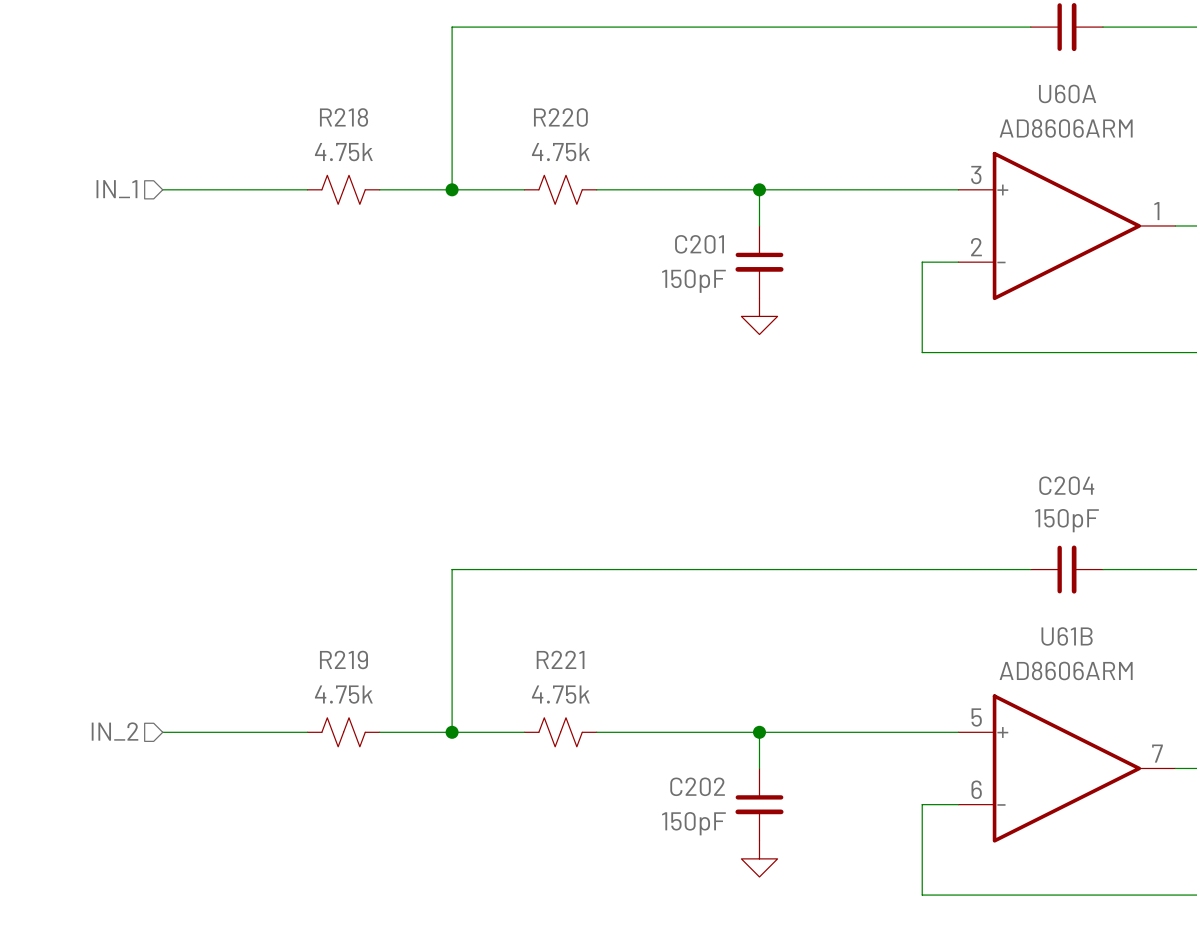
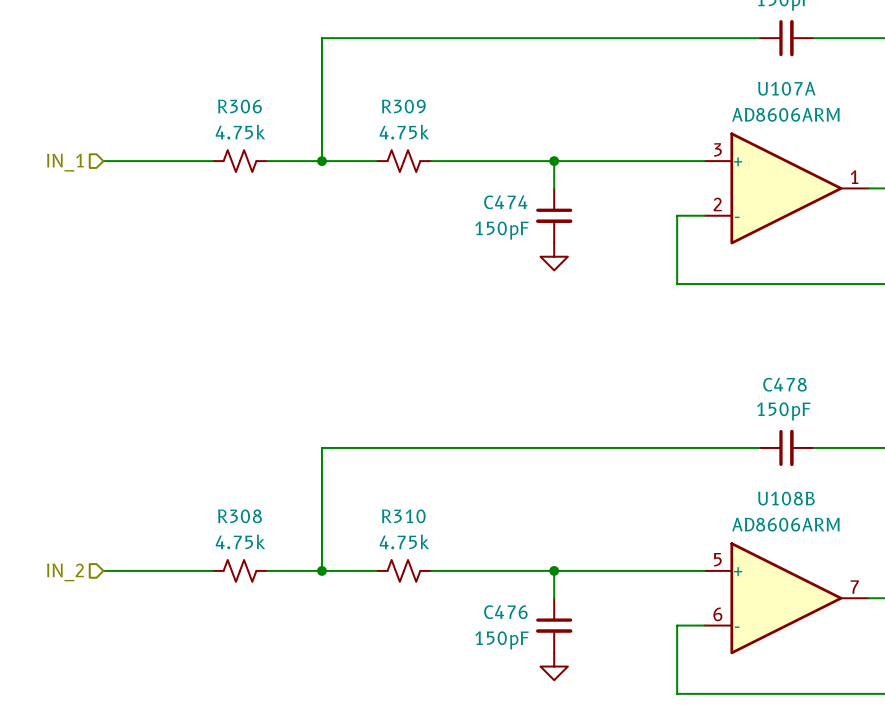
U60A name: U60A (1067, 93) -> U107A (786, 88)
R218 name: R218 (344, 117) -> R306 (239, 106)
R220 name: R220 (560, 117) -> R309 (403, 106)
C201 name: C201 (699, 244) -> C474 (505, 202)
C204 name: C204 (1066, 485) -> C478 (785, 384)
U61B name: U61B (1067, 636) -> U108B (786, 498)
R219 name: R219 (343, 659) -> R308 (239, 516)
R221 name: R221 (560, 659) -> R310 (403, 516)
C202 name: C202 (697, 786) -> C476 (505, 612)

